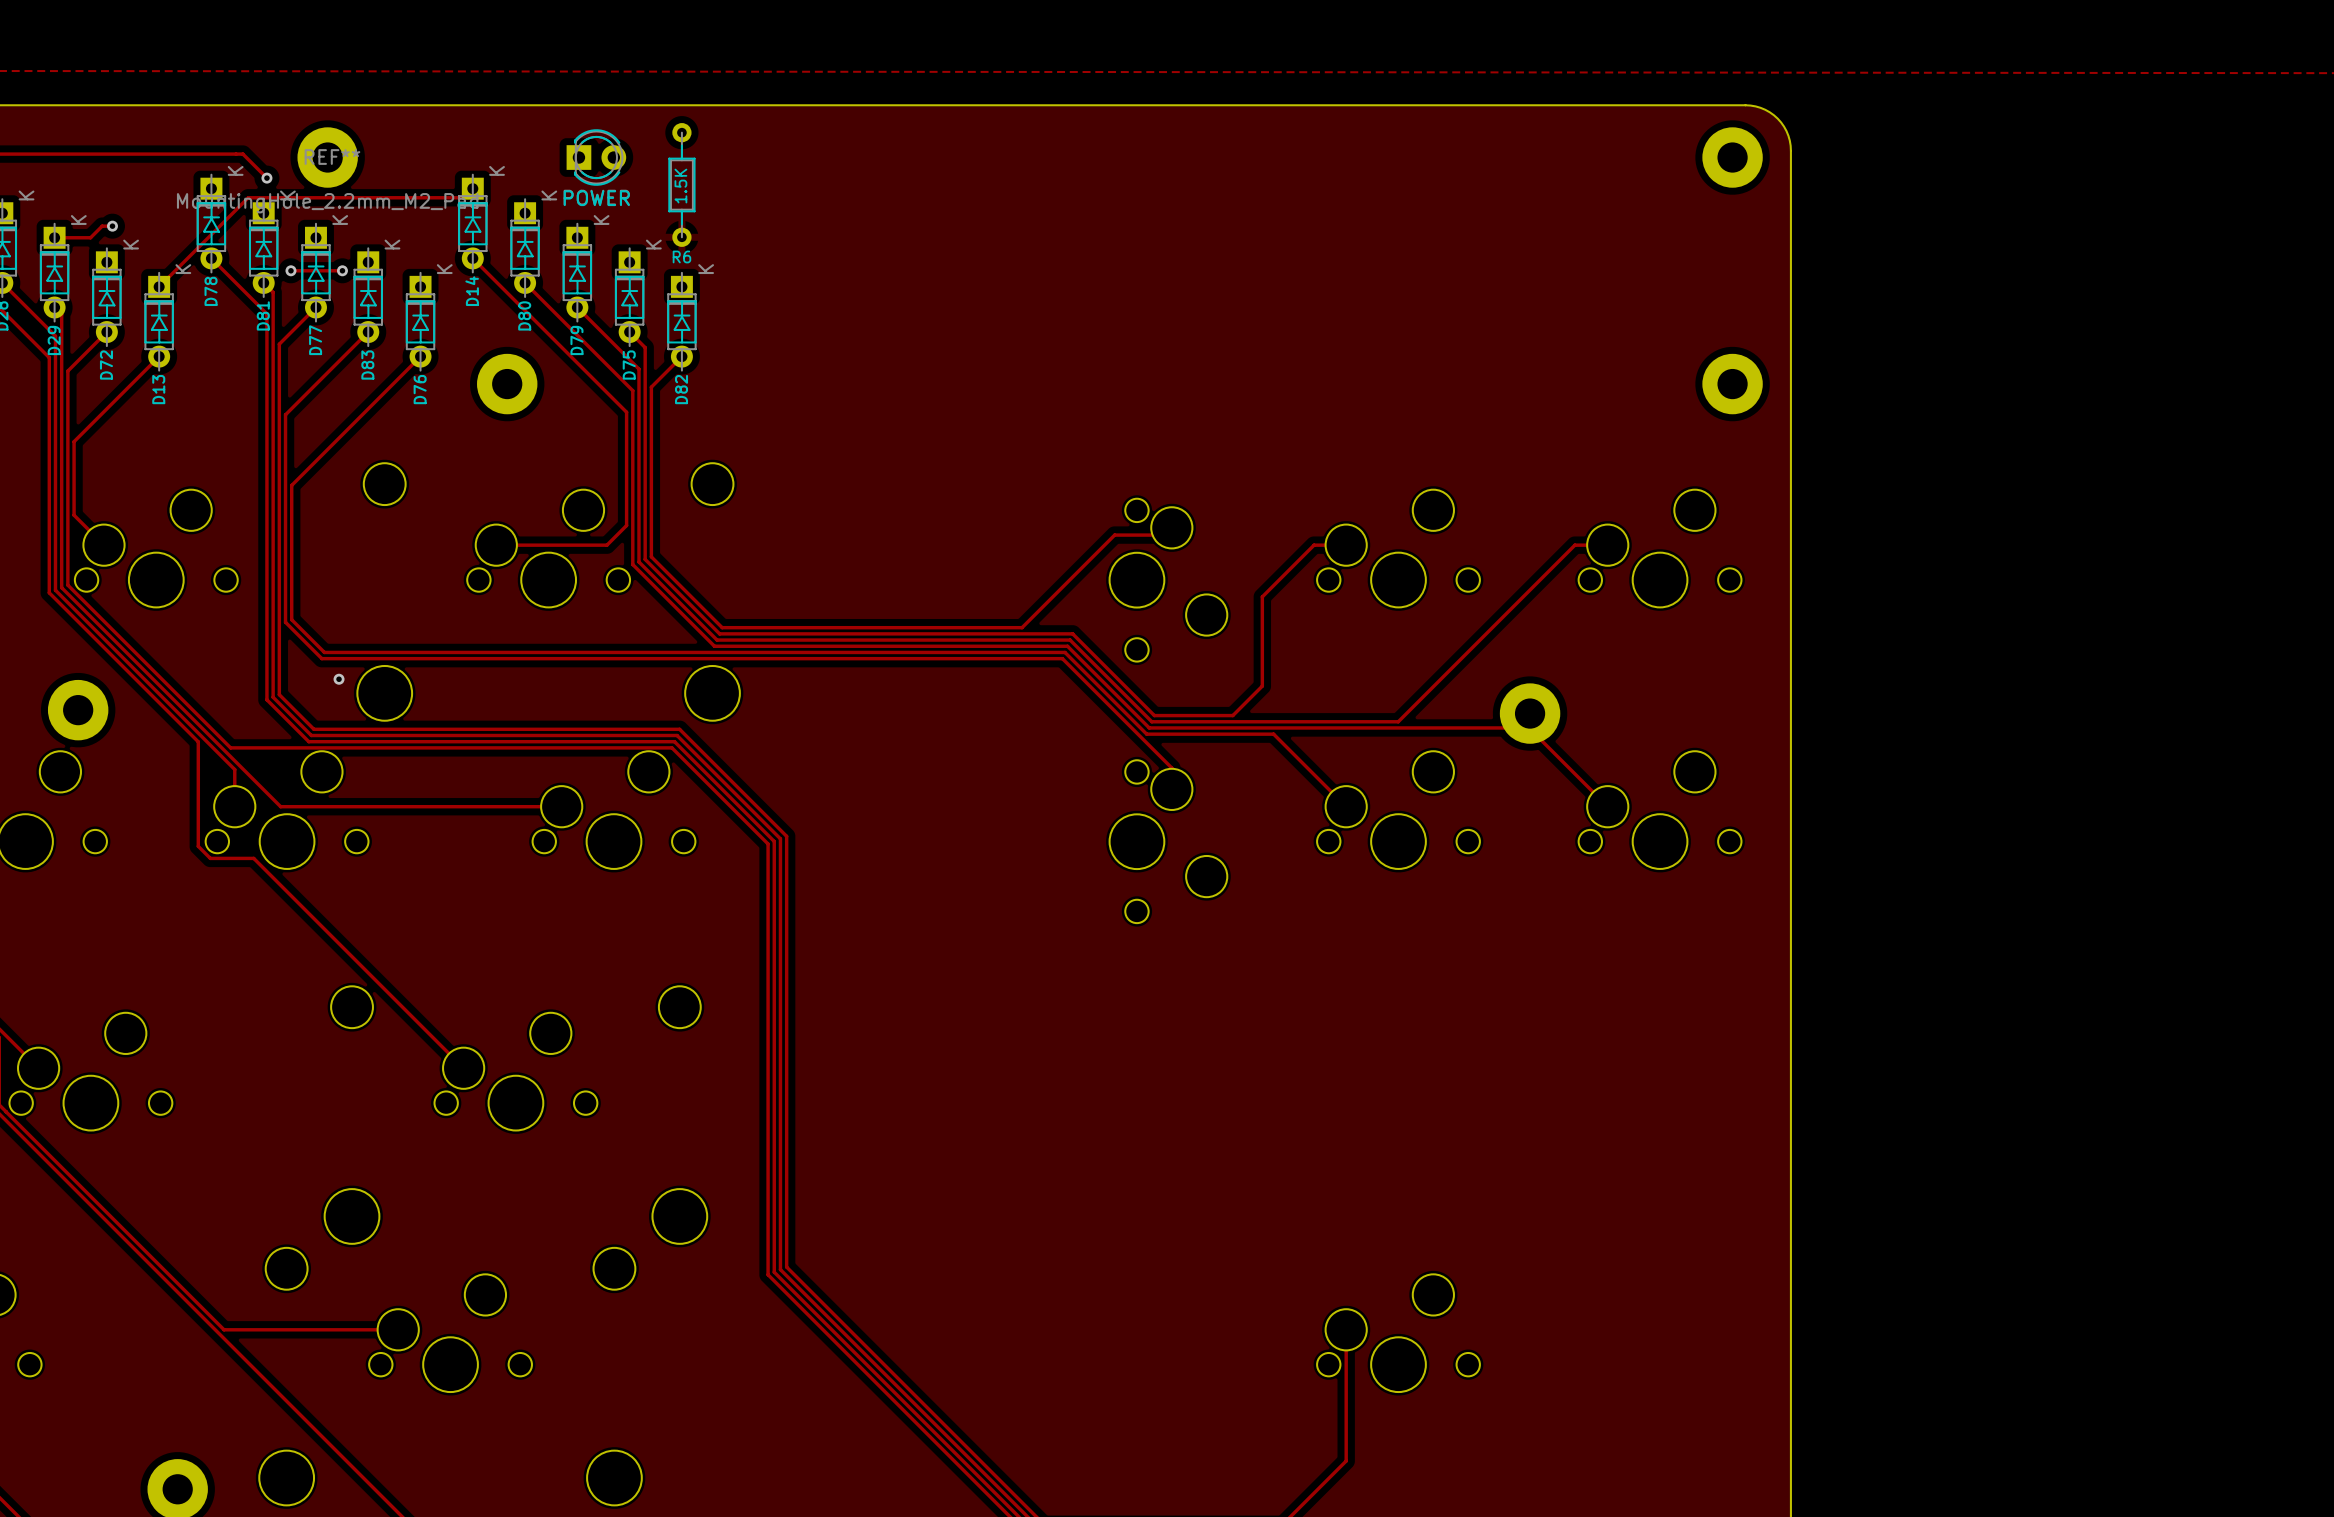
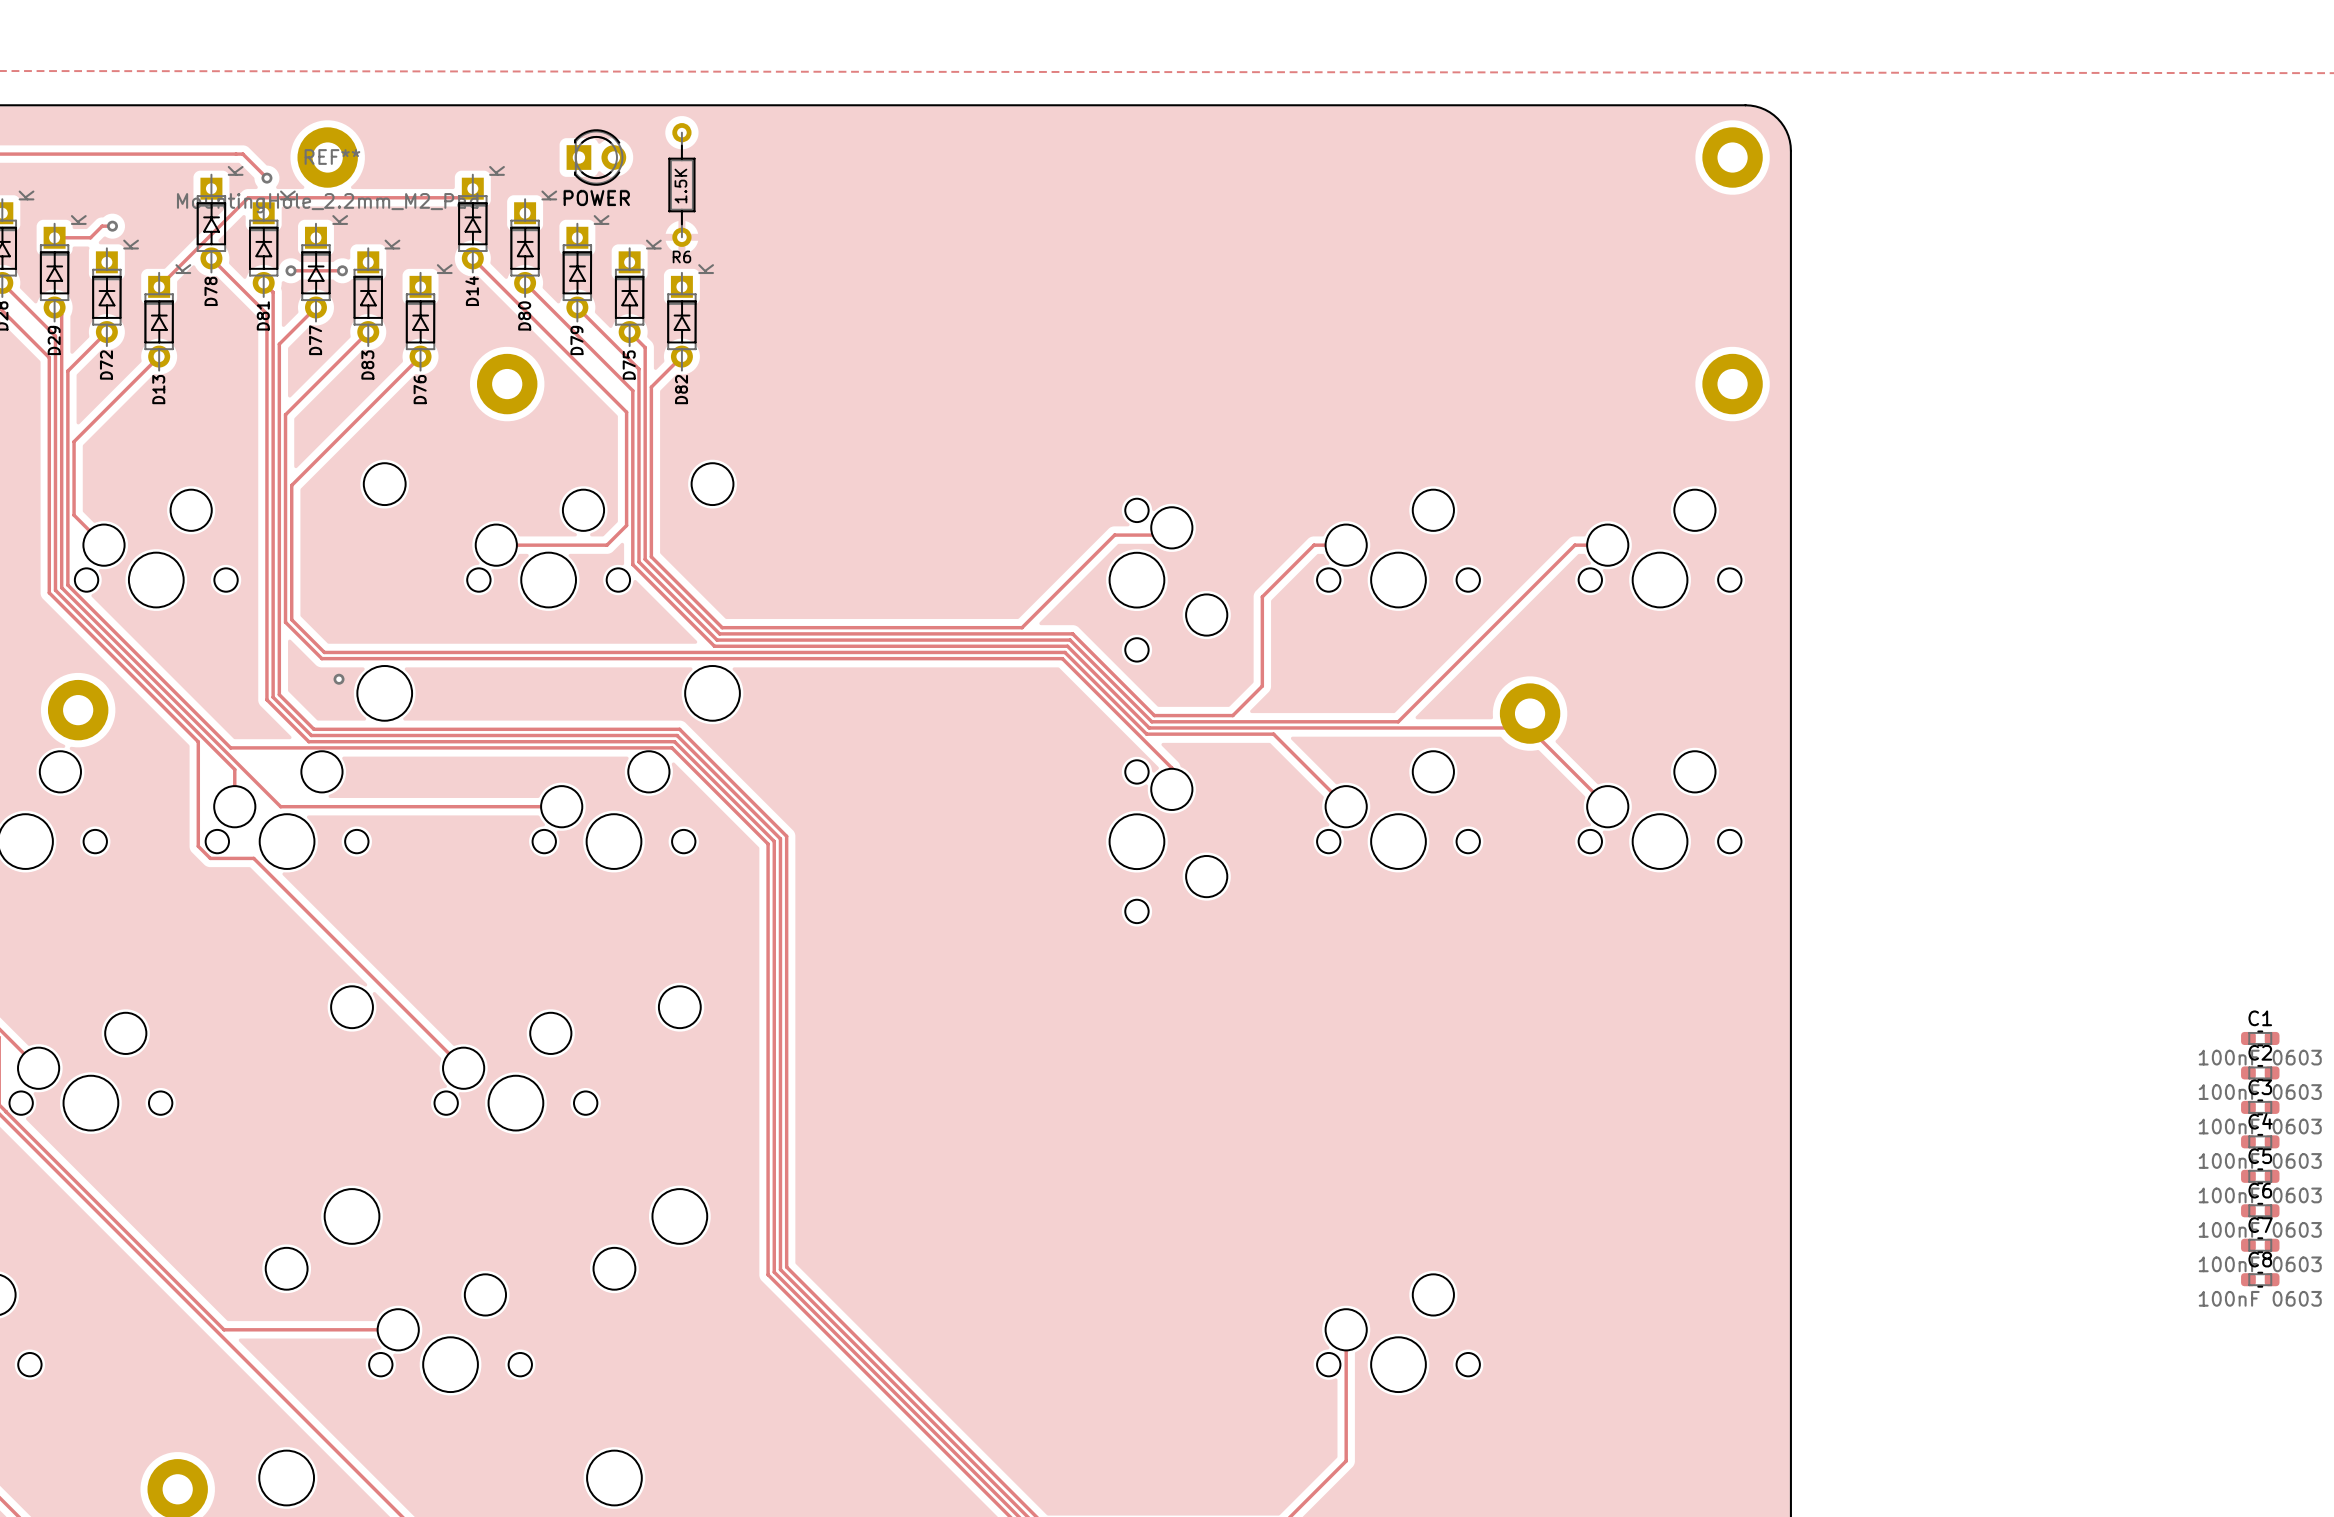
C1: none -> 100nF 0603 (2260, 1038)
C2: none -> 100nF 0603 (2260, 1072)
C3: none -> 100nF 0603 (2260, 1107)
C4: none -> 100nF 0603 (2260, 1141)
C5: none -> 100nF 0603 (2260, 1176)
C6: none -> 100nF 0603 (2260, 1210)
C7: none -> 100nF 0603 (2260, 1245)
C8: none -> 100nF 0603 (2260, 1279)

